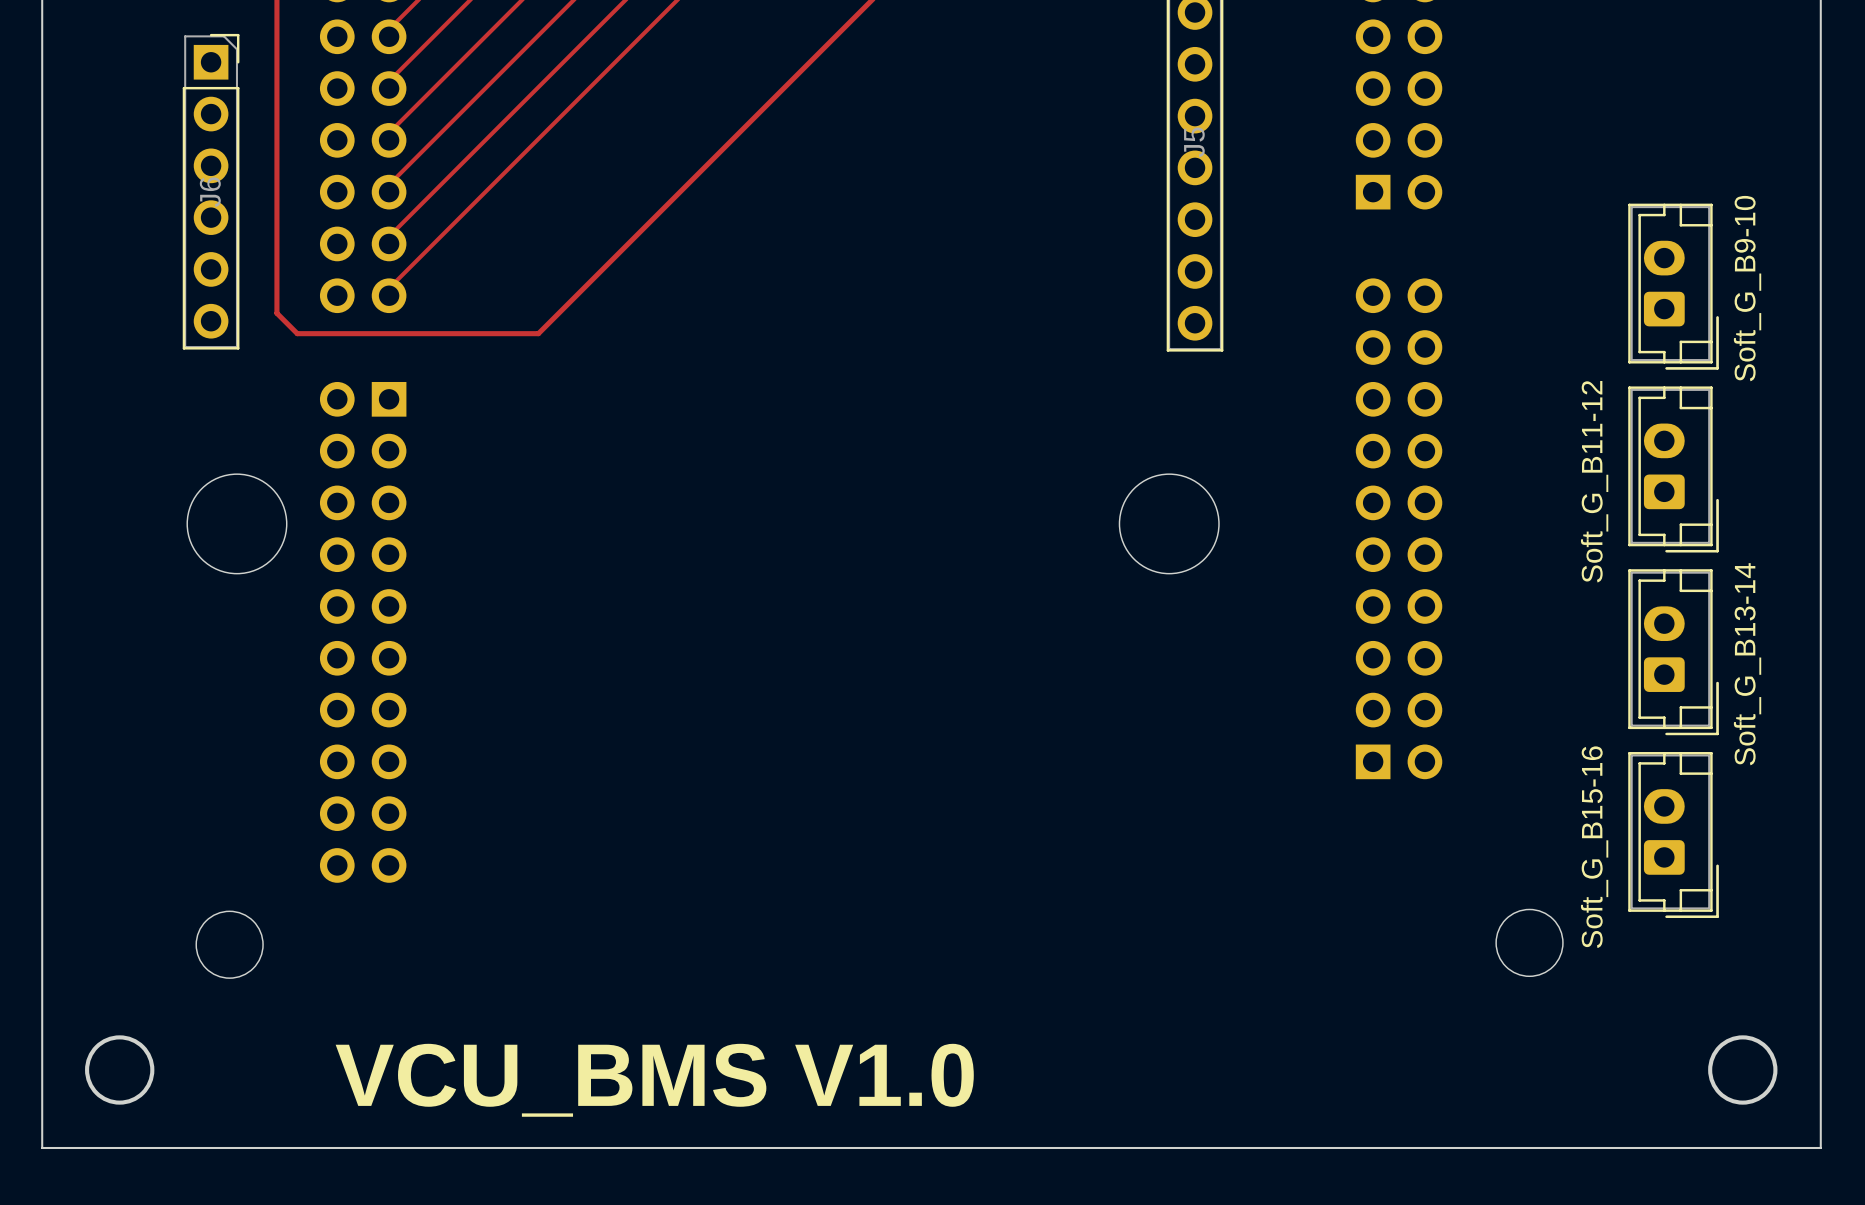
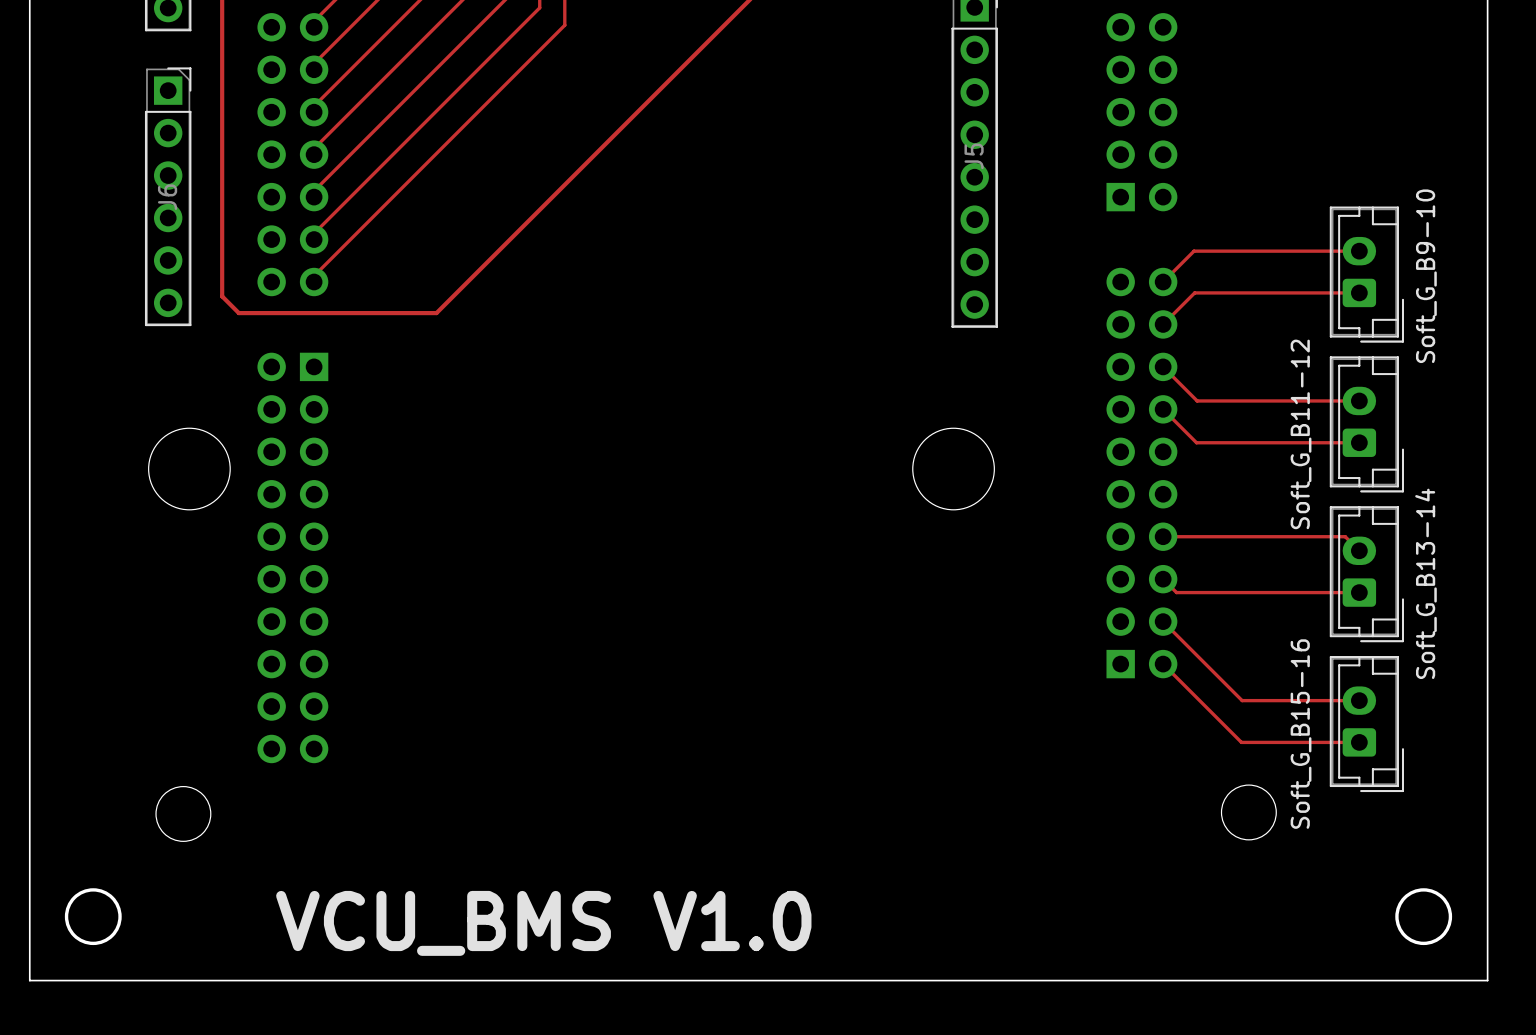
track: none -> (1359, 251) (1194, 251) (1163, 282)
track: none -> (1359, 292) (1194, 292) (1163, 324)
track: none -> (1163, 366) (1197, 400) (1359, 400)
track: none -> (1163, 409) (1196, 442) (1359, 442)
track: none -> (1163, 536) (1345, 536) (1359, 550)
track: none -> (1163, 579) (1176, 592) (1359, 592)
track: none -> (1163, 621) (1242, 700) (1359, 700)
track: none -> (1163, 664) (1241, 742) (1359, 742)

